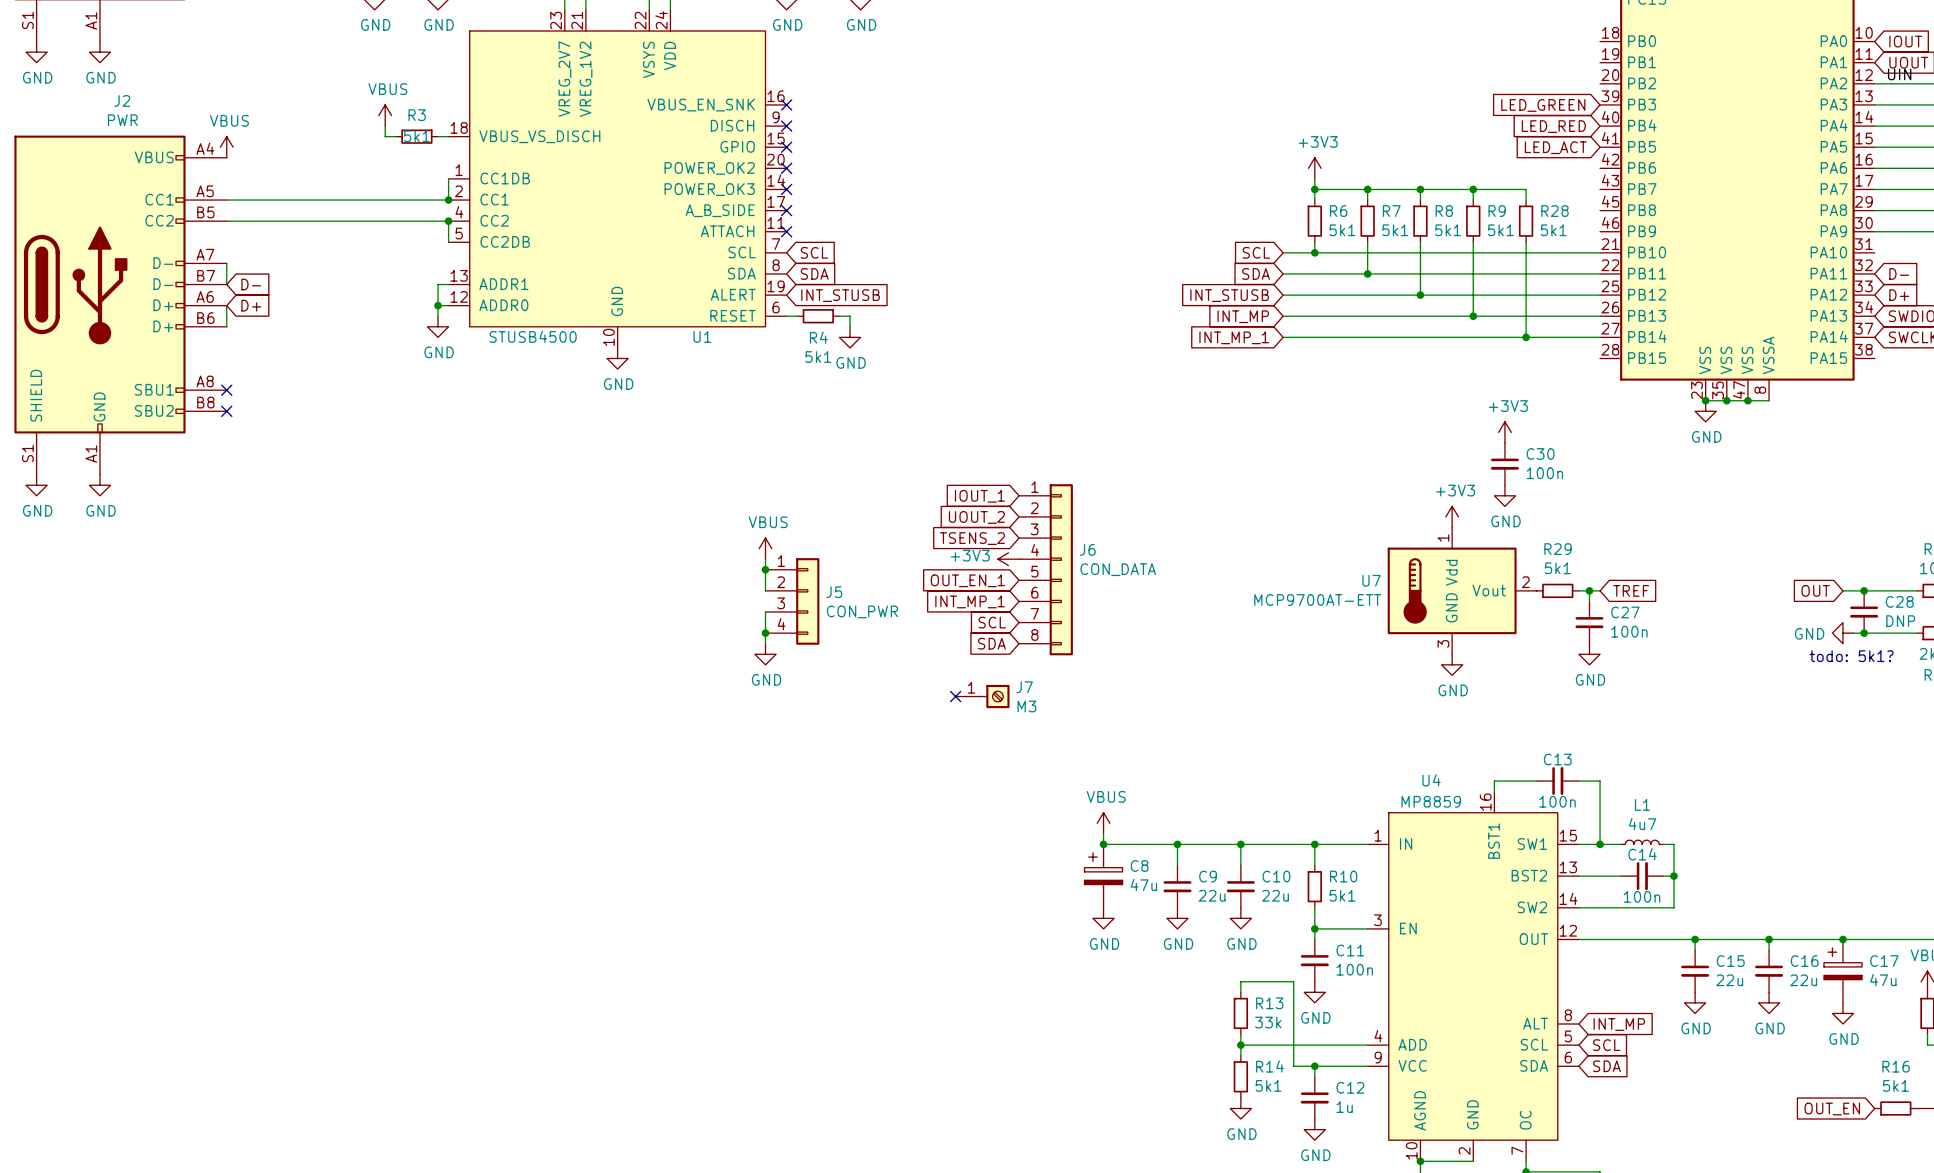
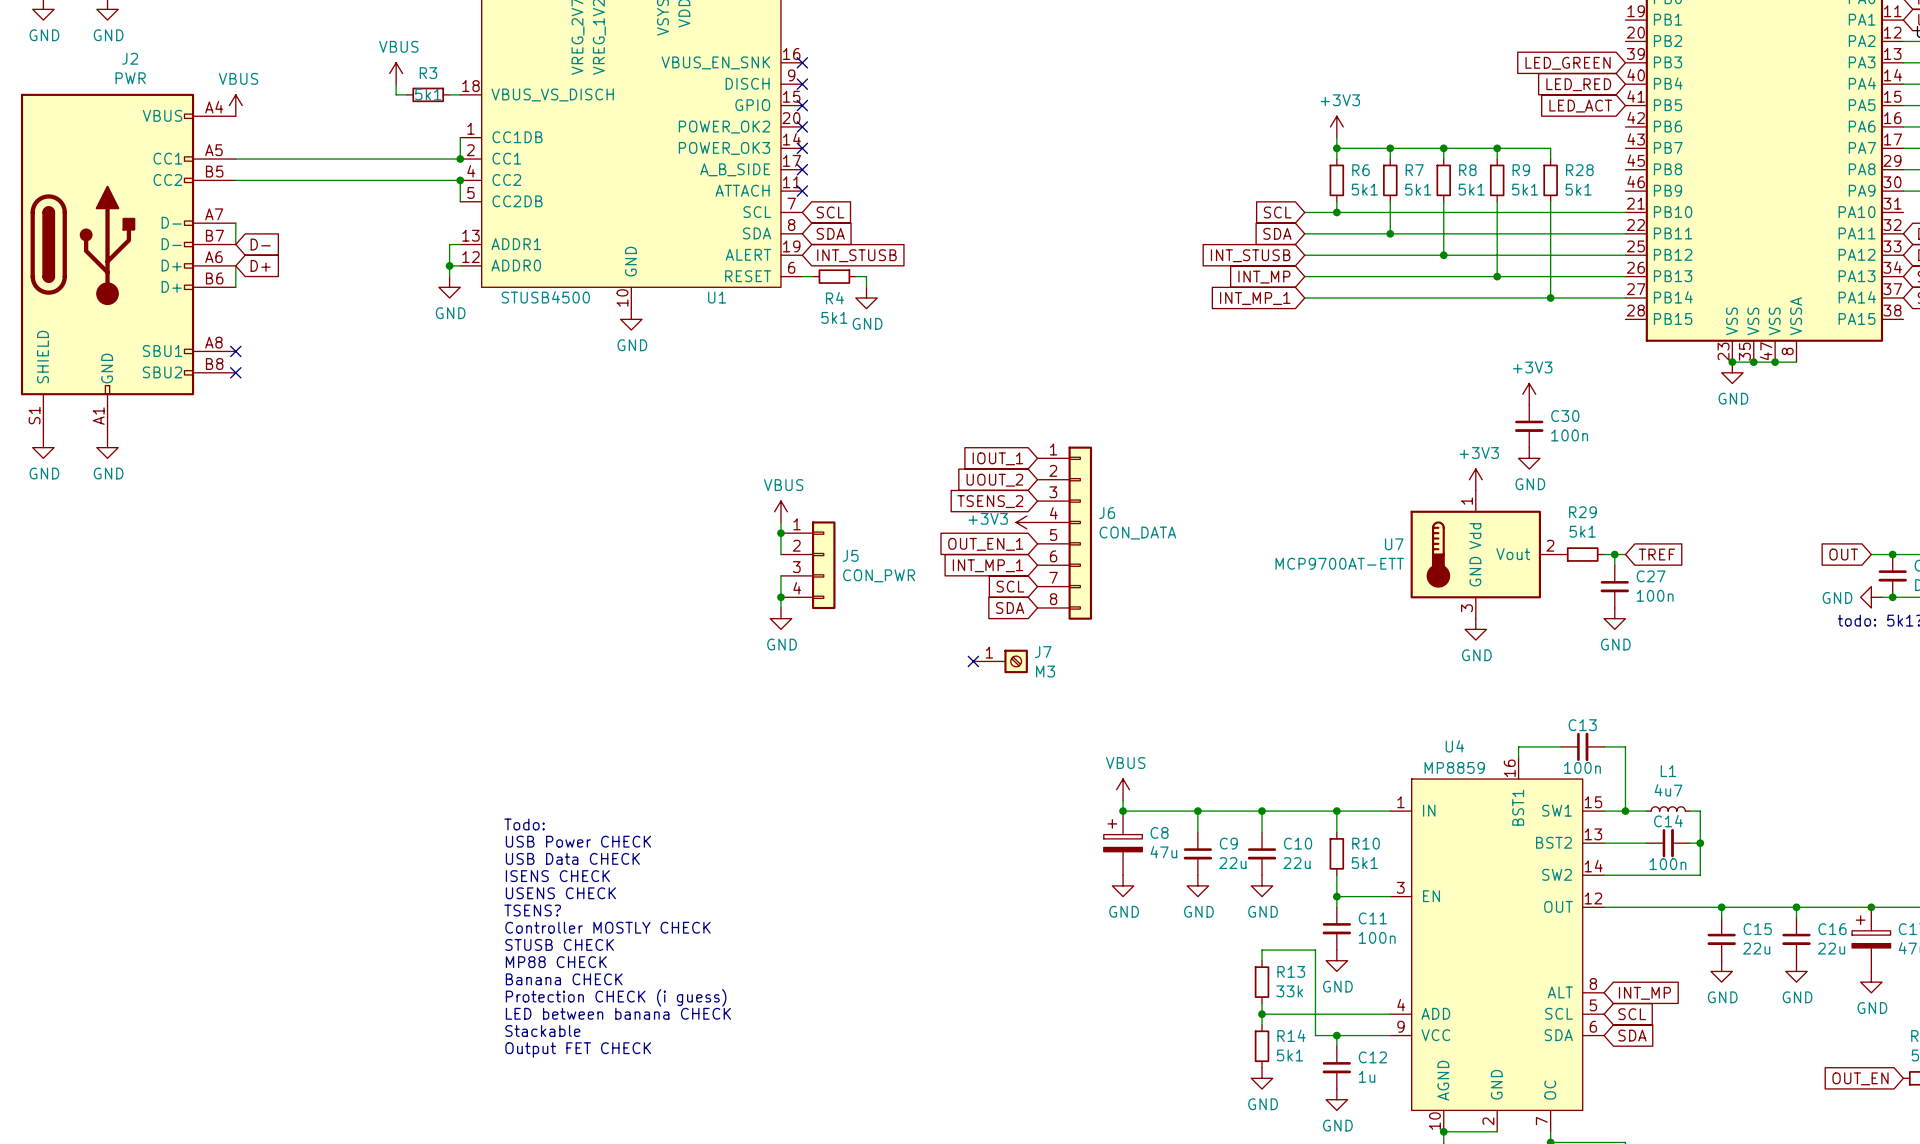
text: none -> Todo: (524, 824)
text: none -> USB Power CHECK (578, 841)
text: none -> USB Data CHECK (572, 858)
text: none -> ISENS CHECK (557, 876)
text: none -> USENS CHECK (560, 893)
text: none -> TSENS? (532, 910)
text: none -> Controller MOSTLY CHECK (607, 927)
text: none -> STUSB CHECK (559, 944)
text: none -> MP88 CHECK (556, 962)
text: none -> Banana CHECK (564, 979)
text: none -> Protection CHECK (i guess) (616, 997)
text: none -> LED between banana CHECK (618, 1013)
text: none -> Stackable (542, 1030)
text: none -> Output FET CHECK (578, 1049)

